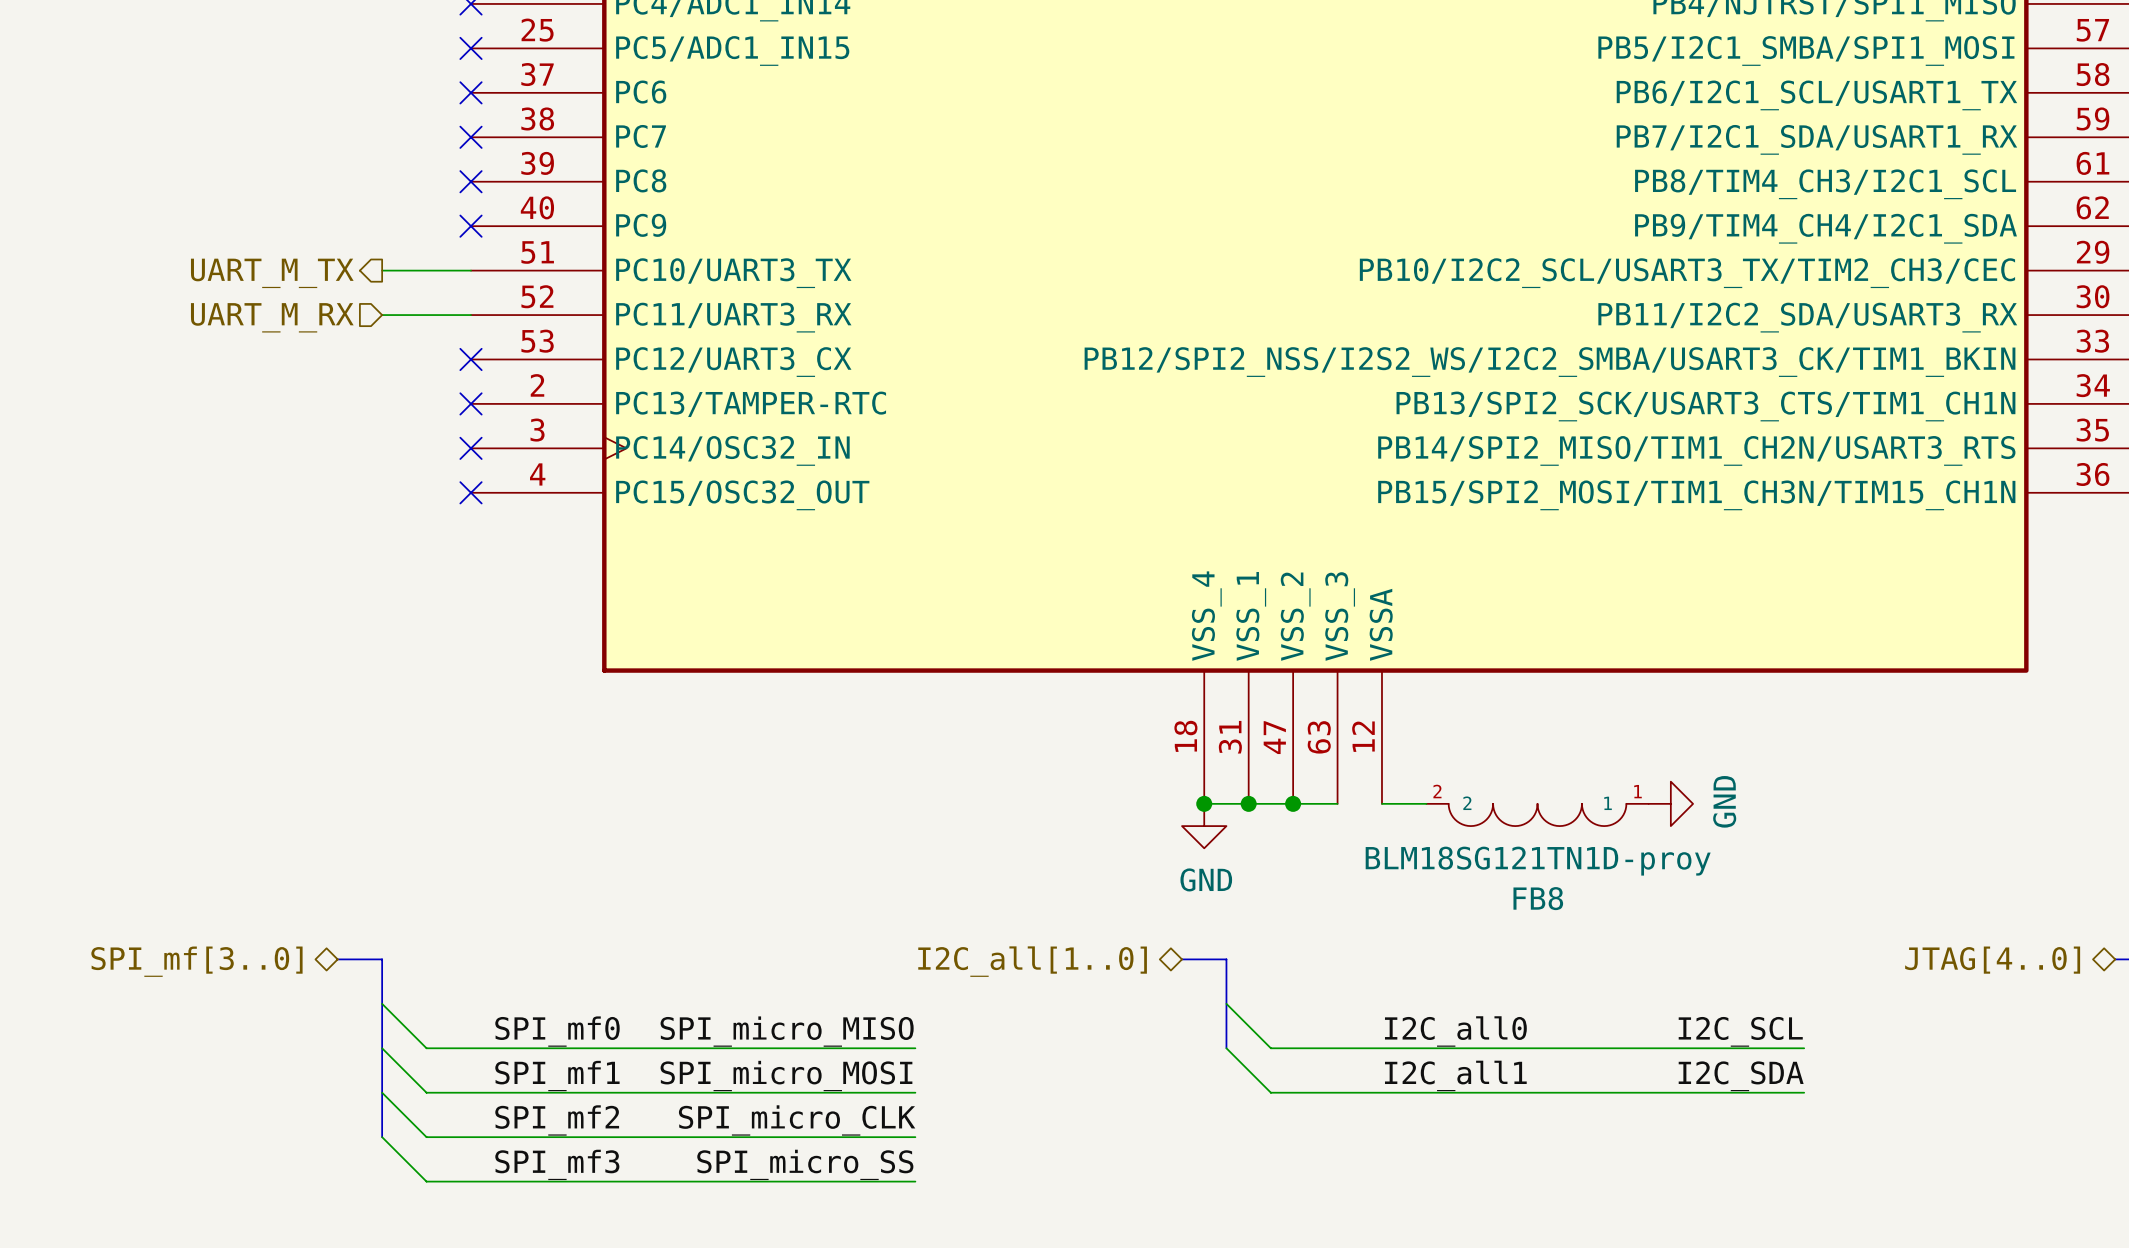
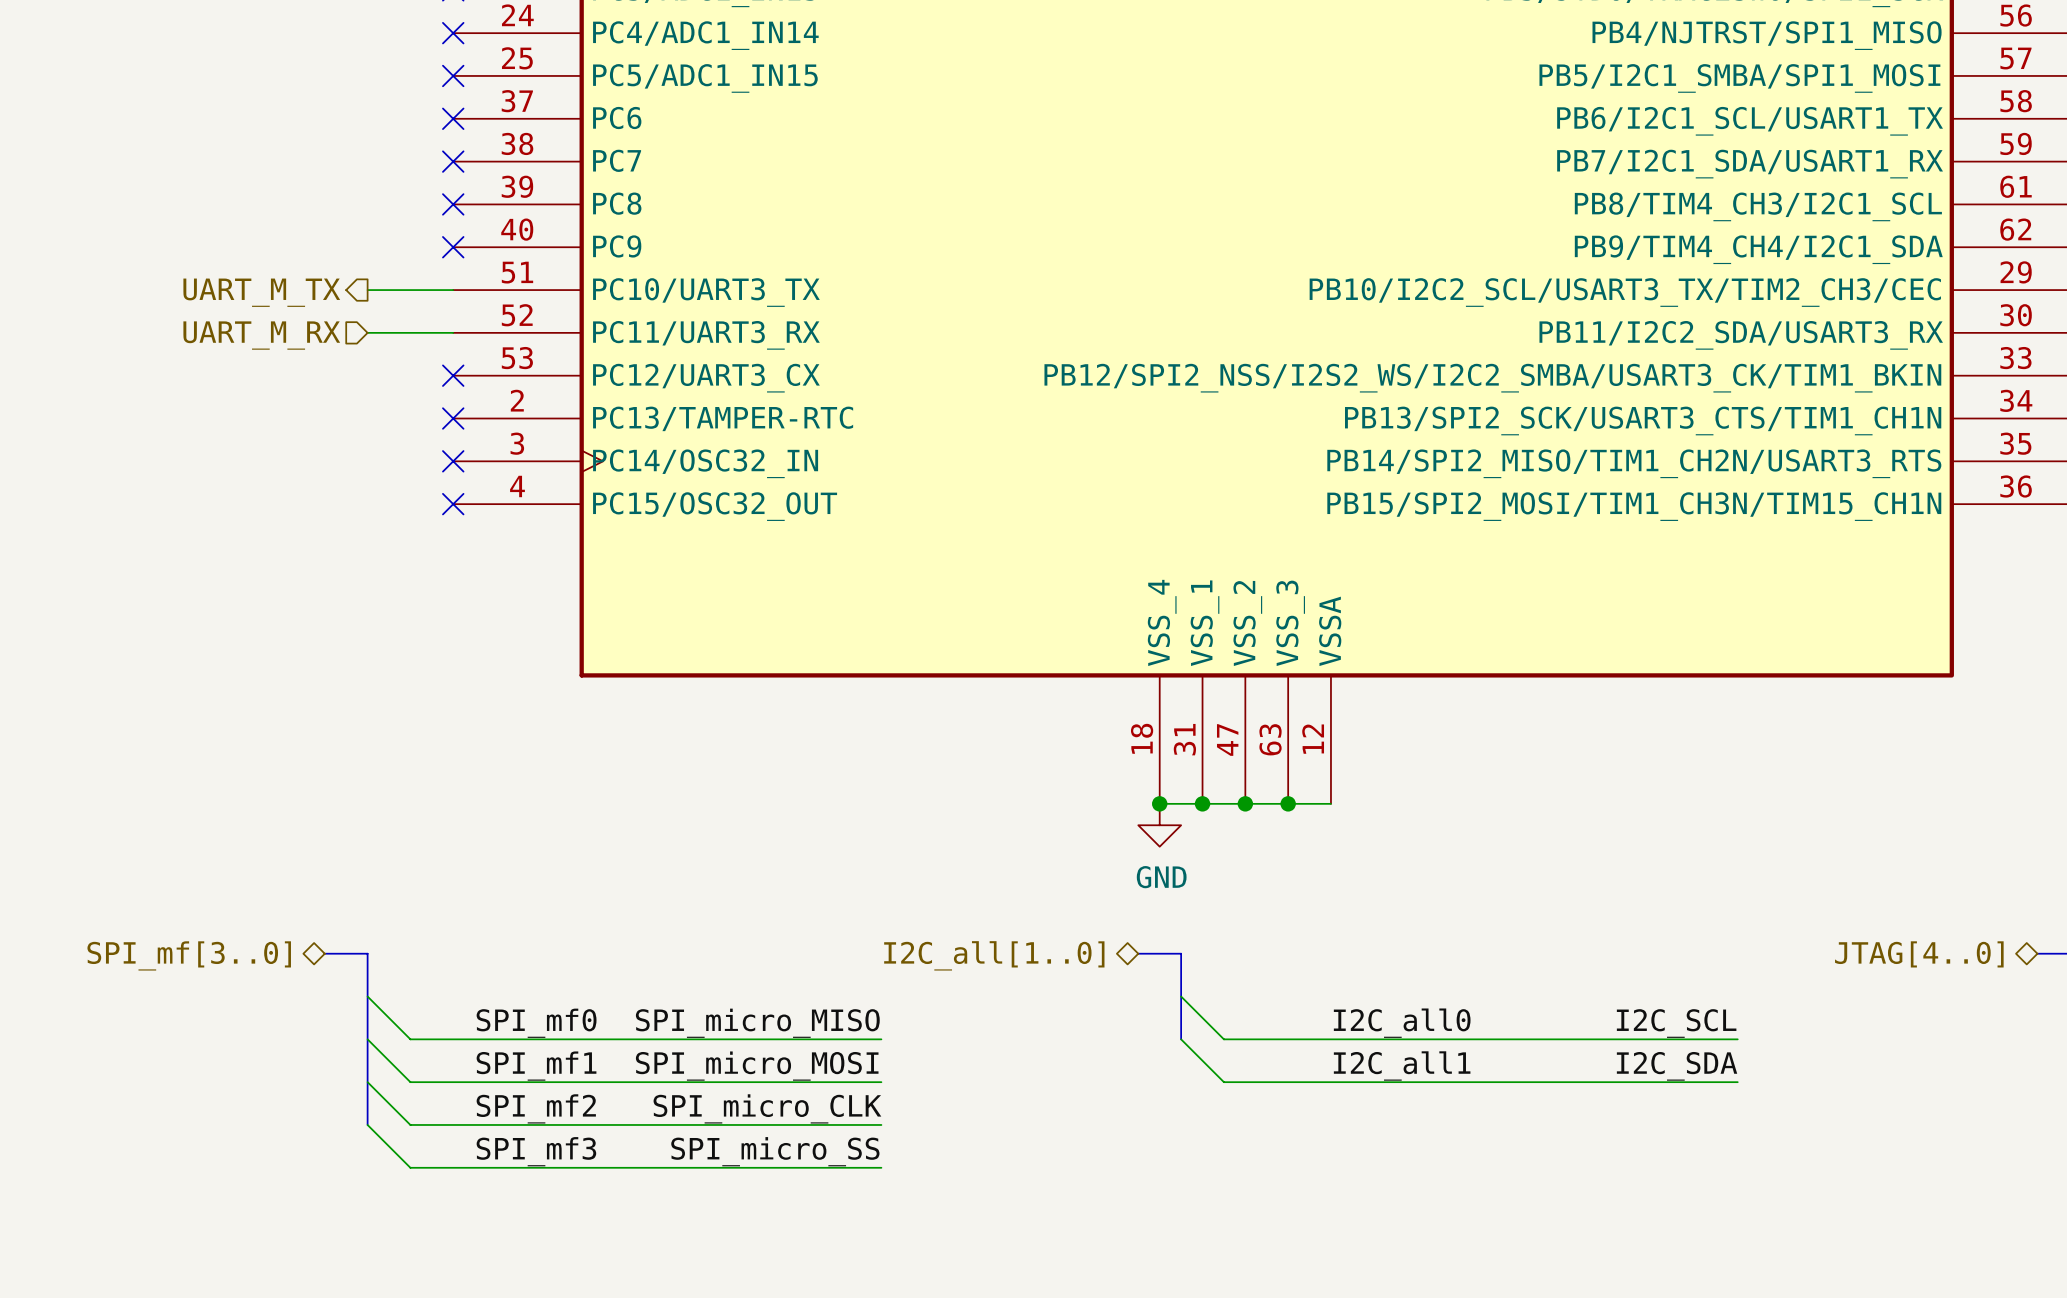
junction: none -> (1288, 803)
wire: (1381, 803) (1426, 803) -> (1330, 803) (1288, 803)
power symbol: GND (1670, 803) -> none
FB8: BLM18SG121TN1D-proy (1537, 814) -> none

